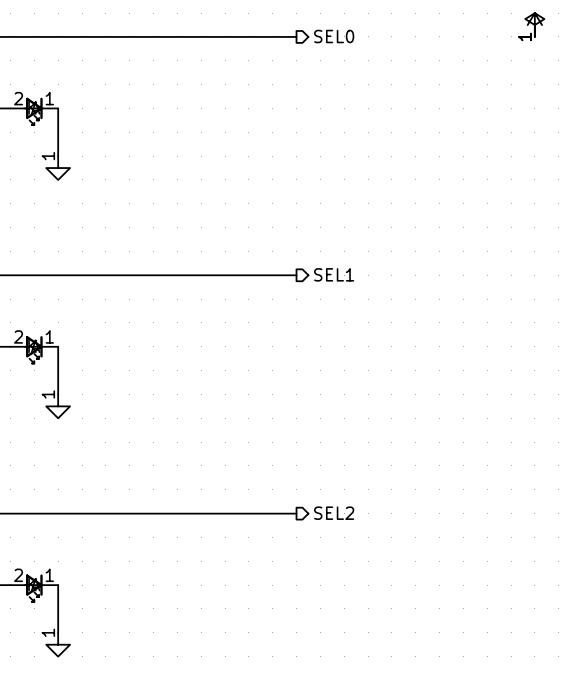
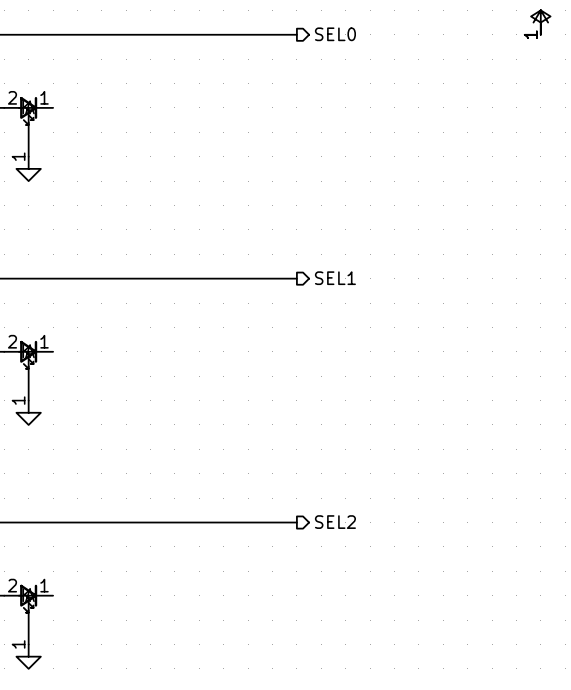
wire: (58, 108) (58, 156) -> (28, 107) (28, 156)
power symbol position: (58, 168) -> (28, 168)
wire: (58, 346) (58, 394) -> (28, 351) (28, 400)
power symbol position: (58, 406) -> (28, 412)
wire: (58, 585) (58, 632) -> (28, 595) (28, 644)
power symbol position: (58, 644) -> (28, 656)

